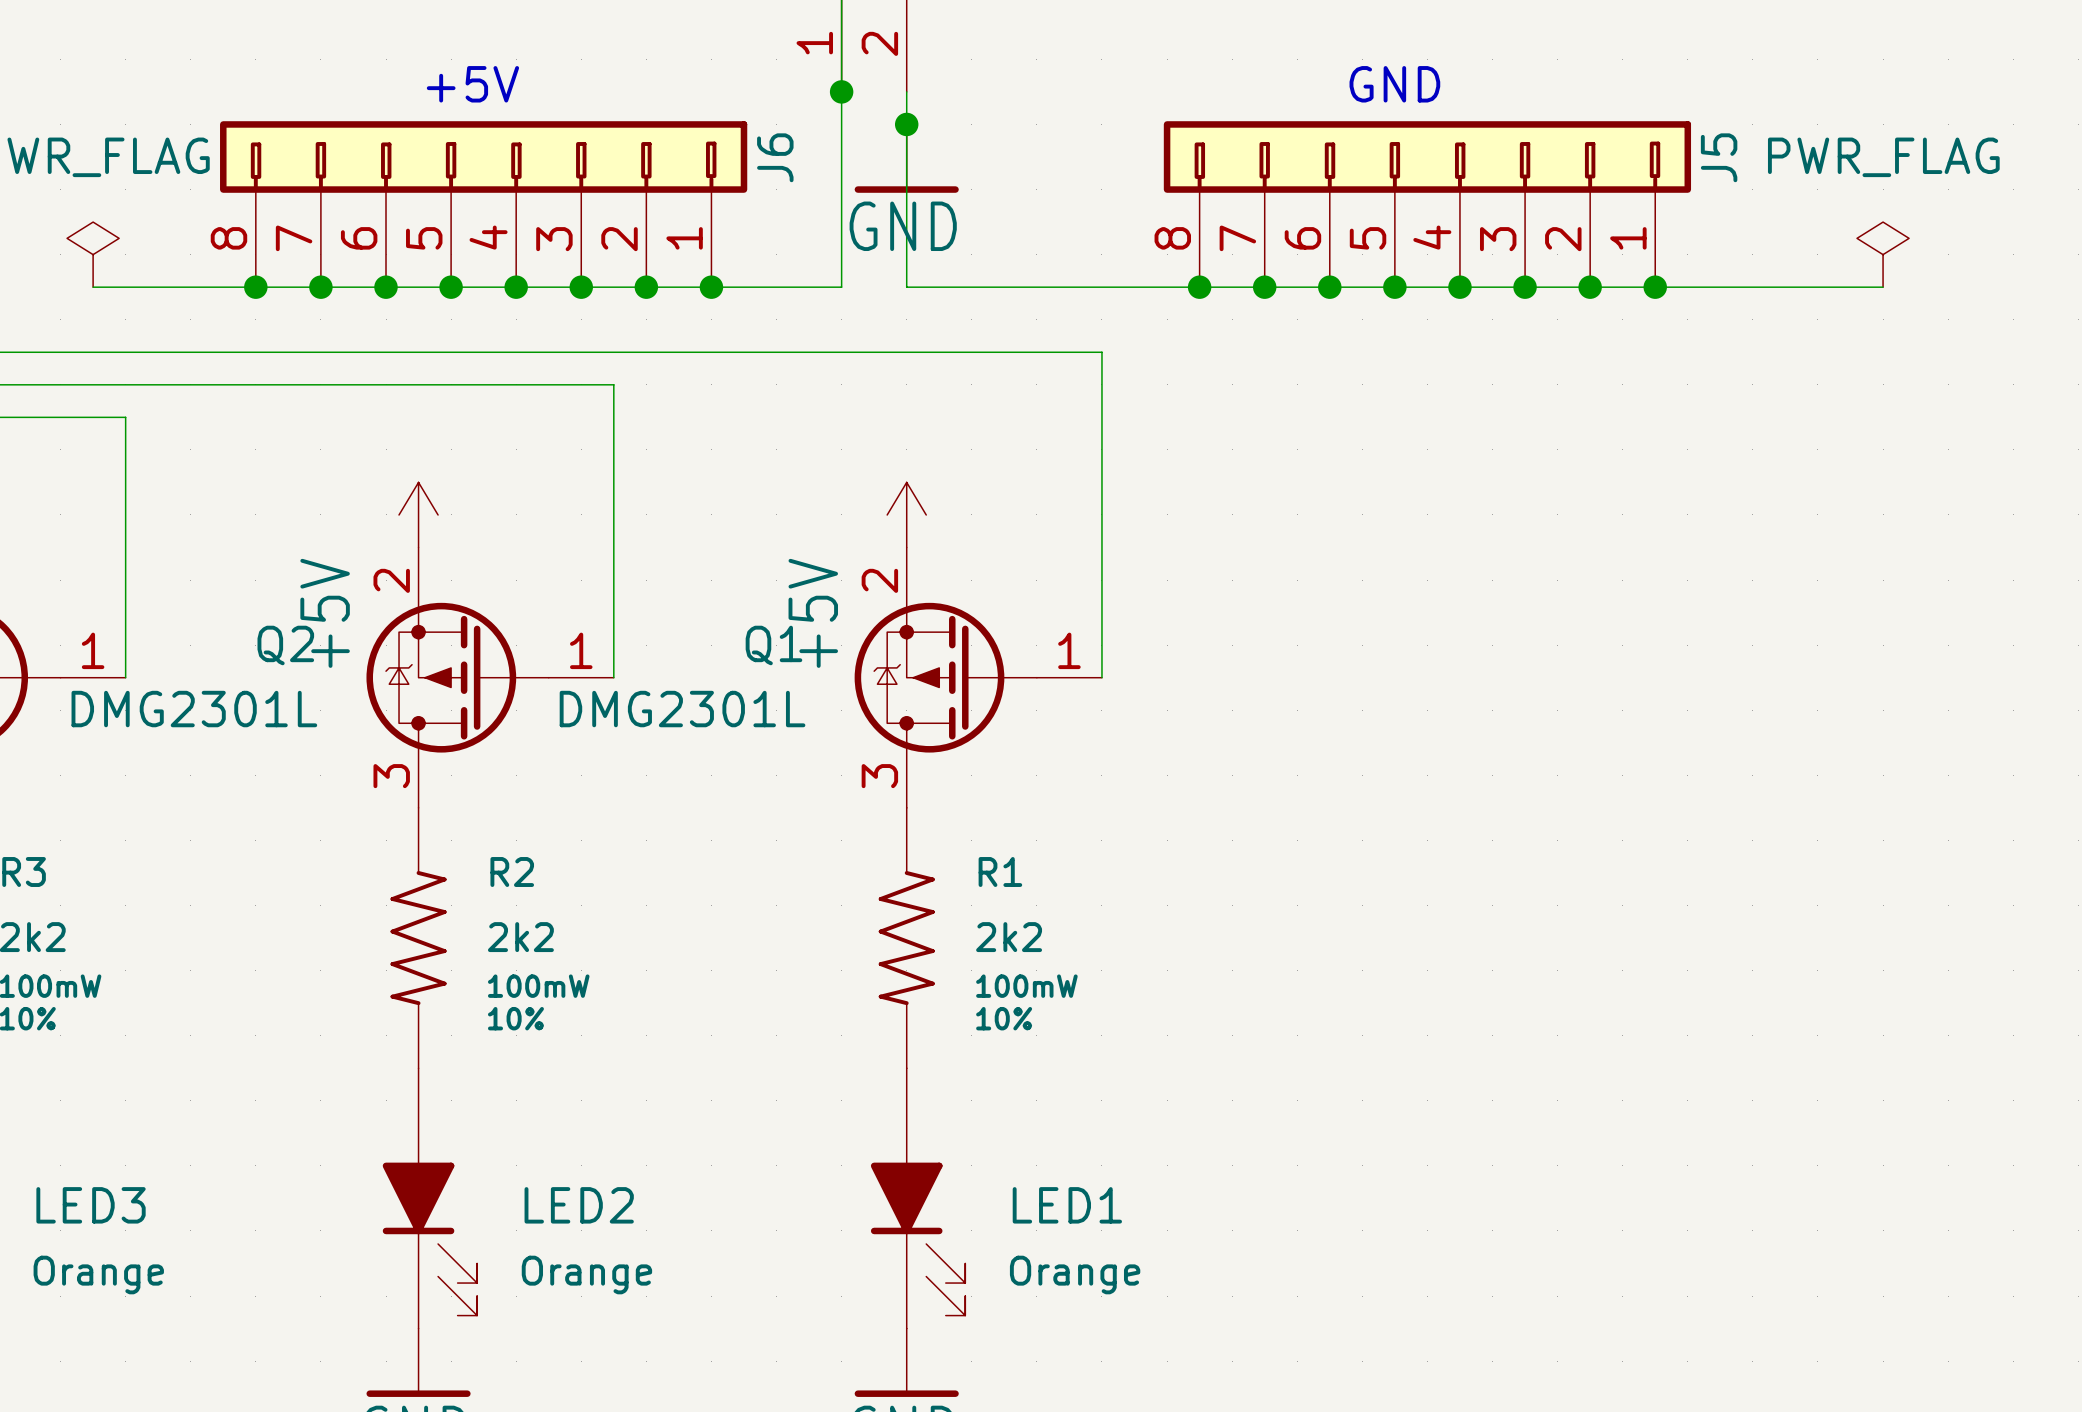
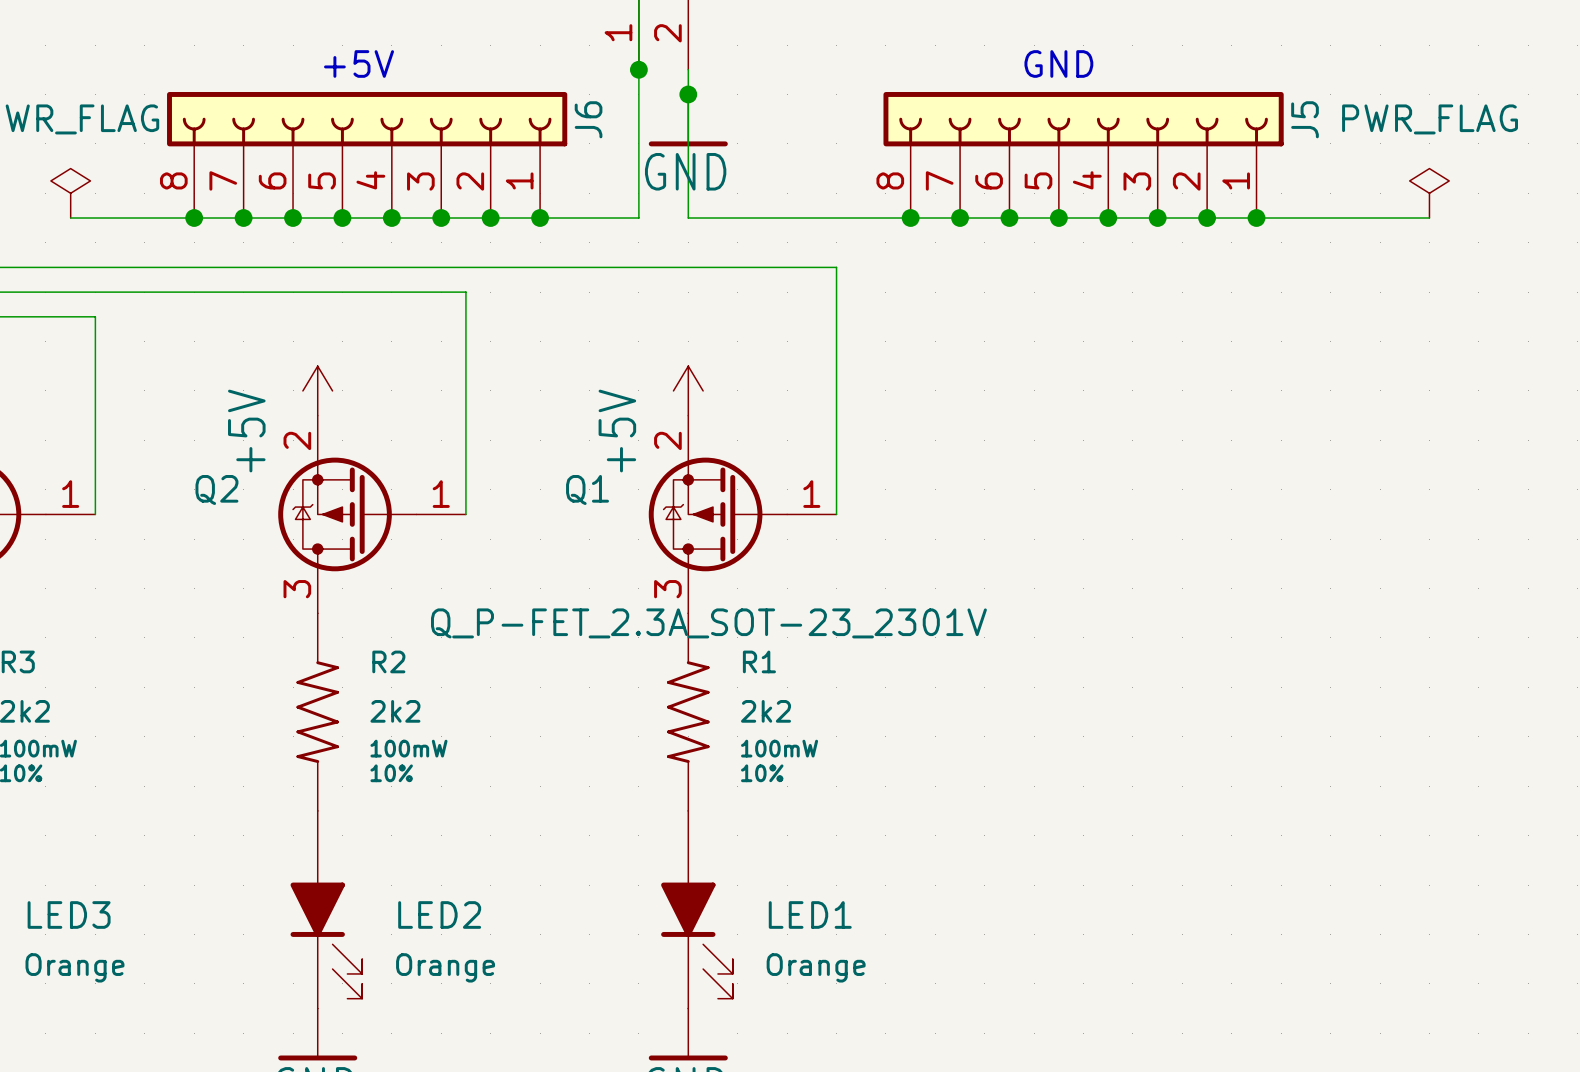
J6 symbol: [220, 121, 748, 288] -> [167, 92, 568, 219]
J5 symbol: [1163, 121, 1692, 288] -> [883, 92, 1284, 219]
power symbol text position: +5V (325, 613) -> +5V (246, 431)
power symbol text position: +5V (813, 613) -> +5V (617, 431)
Q2 value: DMG2301L (194, 709) -> none
Q1 value: DMG2301L (682, 709) -> Q_P-FET_2.3A_SOT-23_2301V (708, 623)

